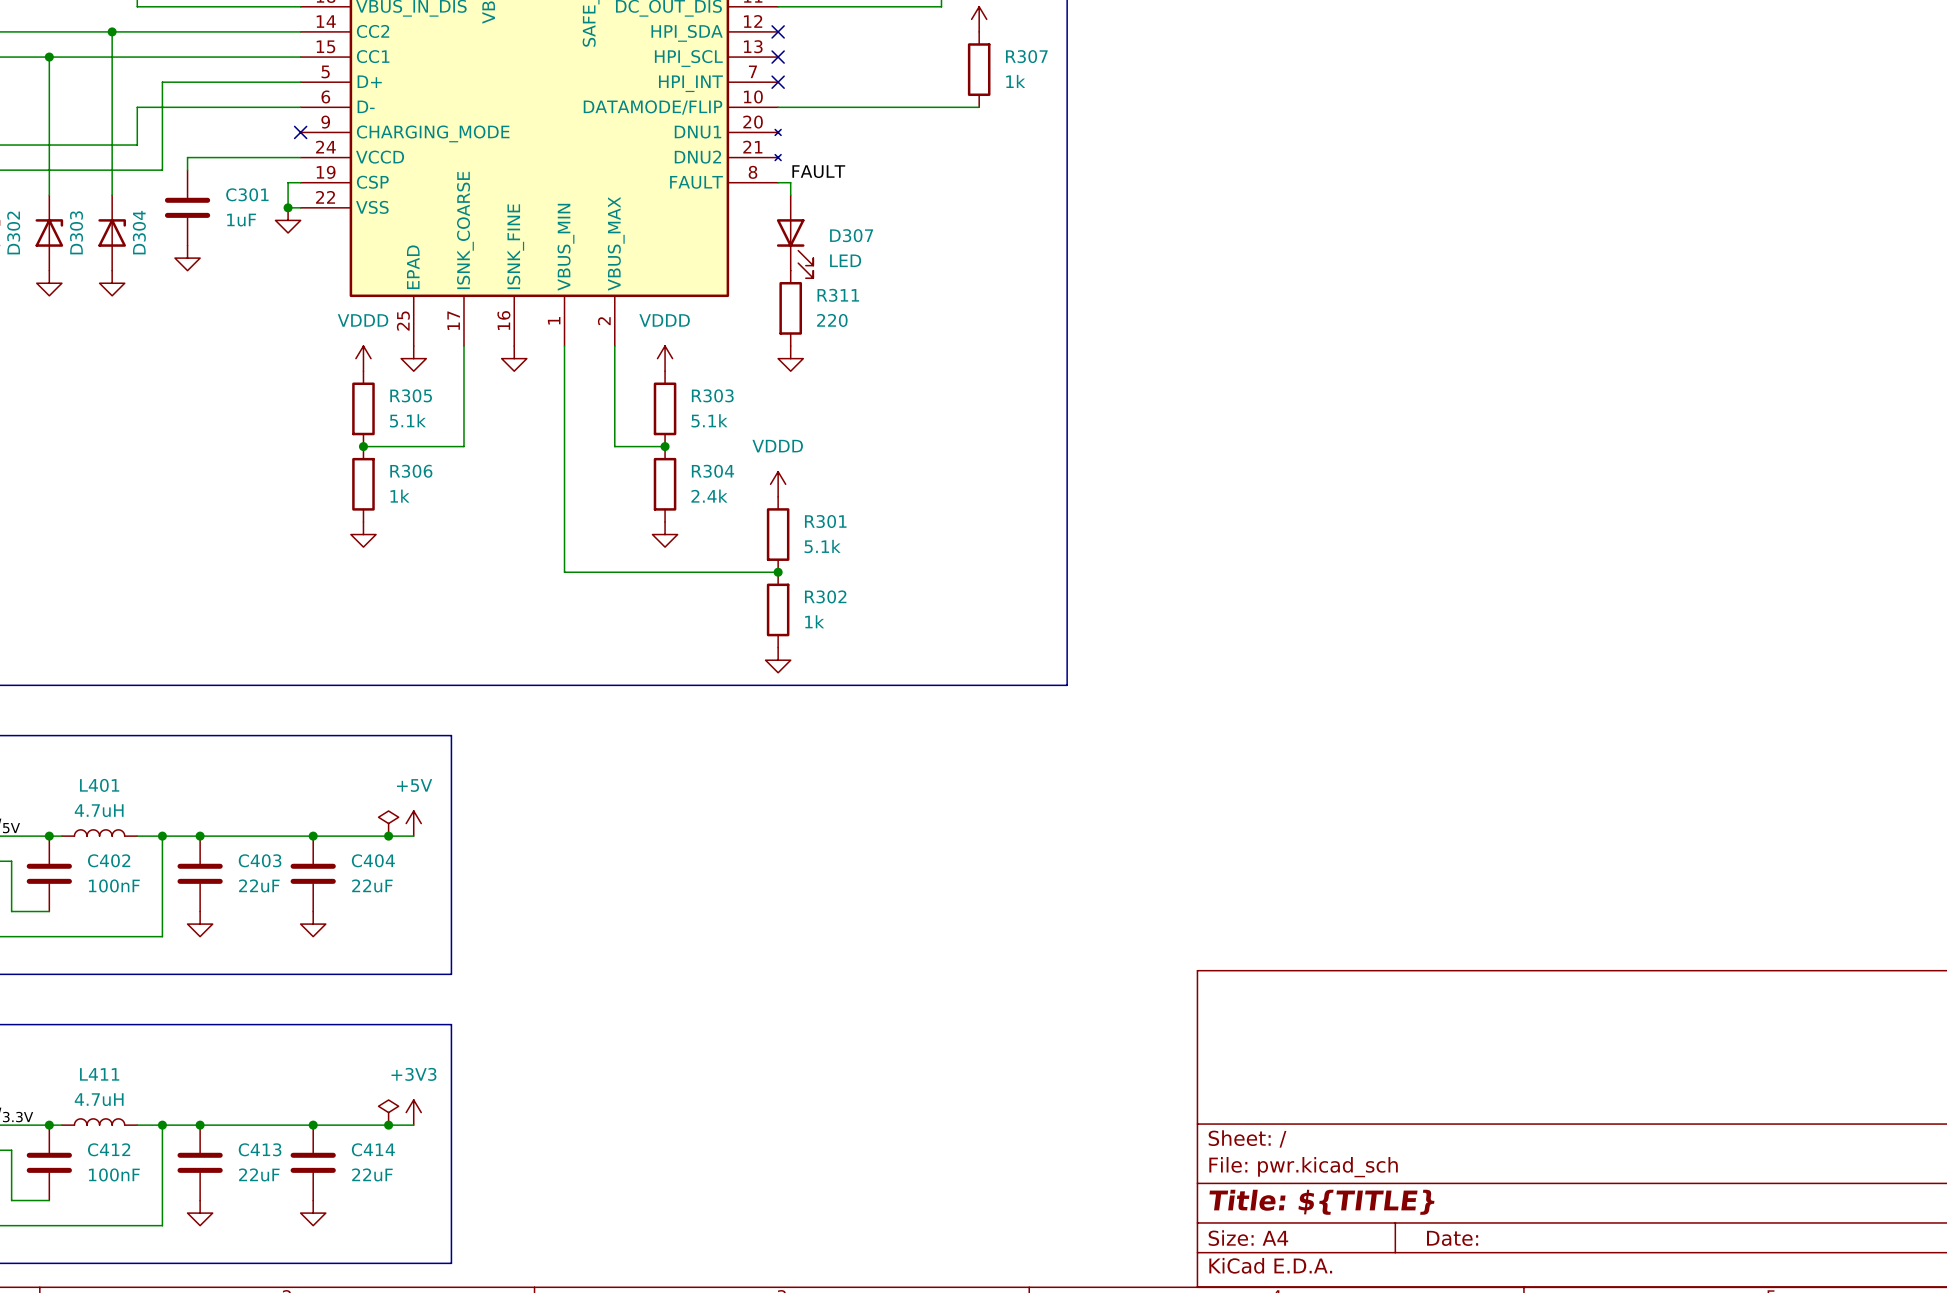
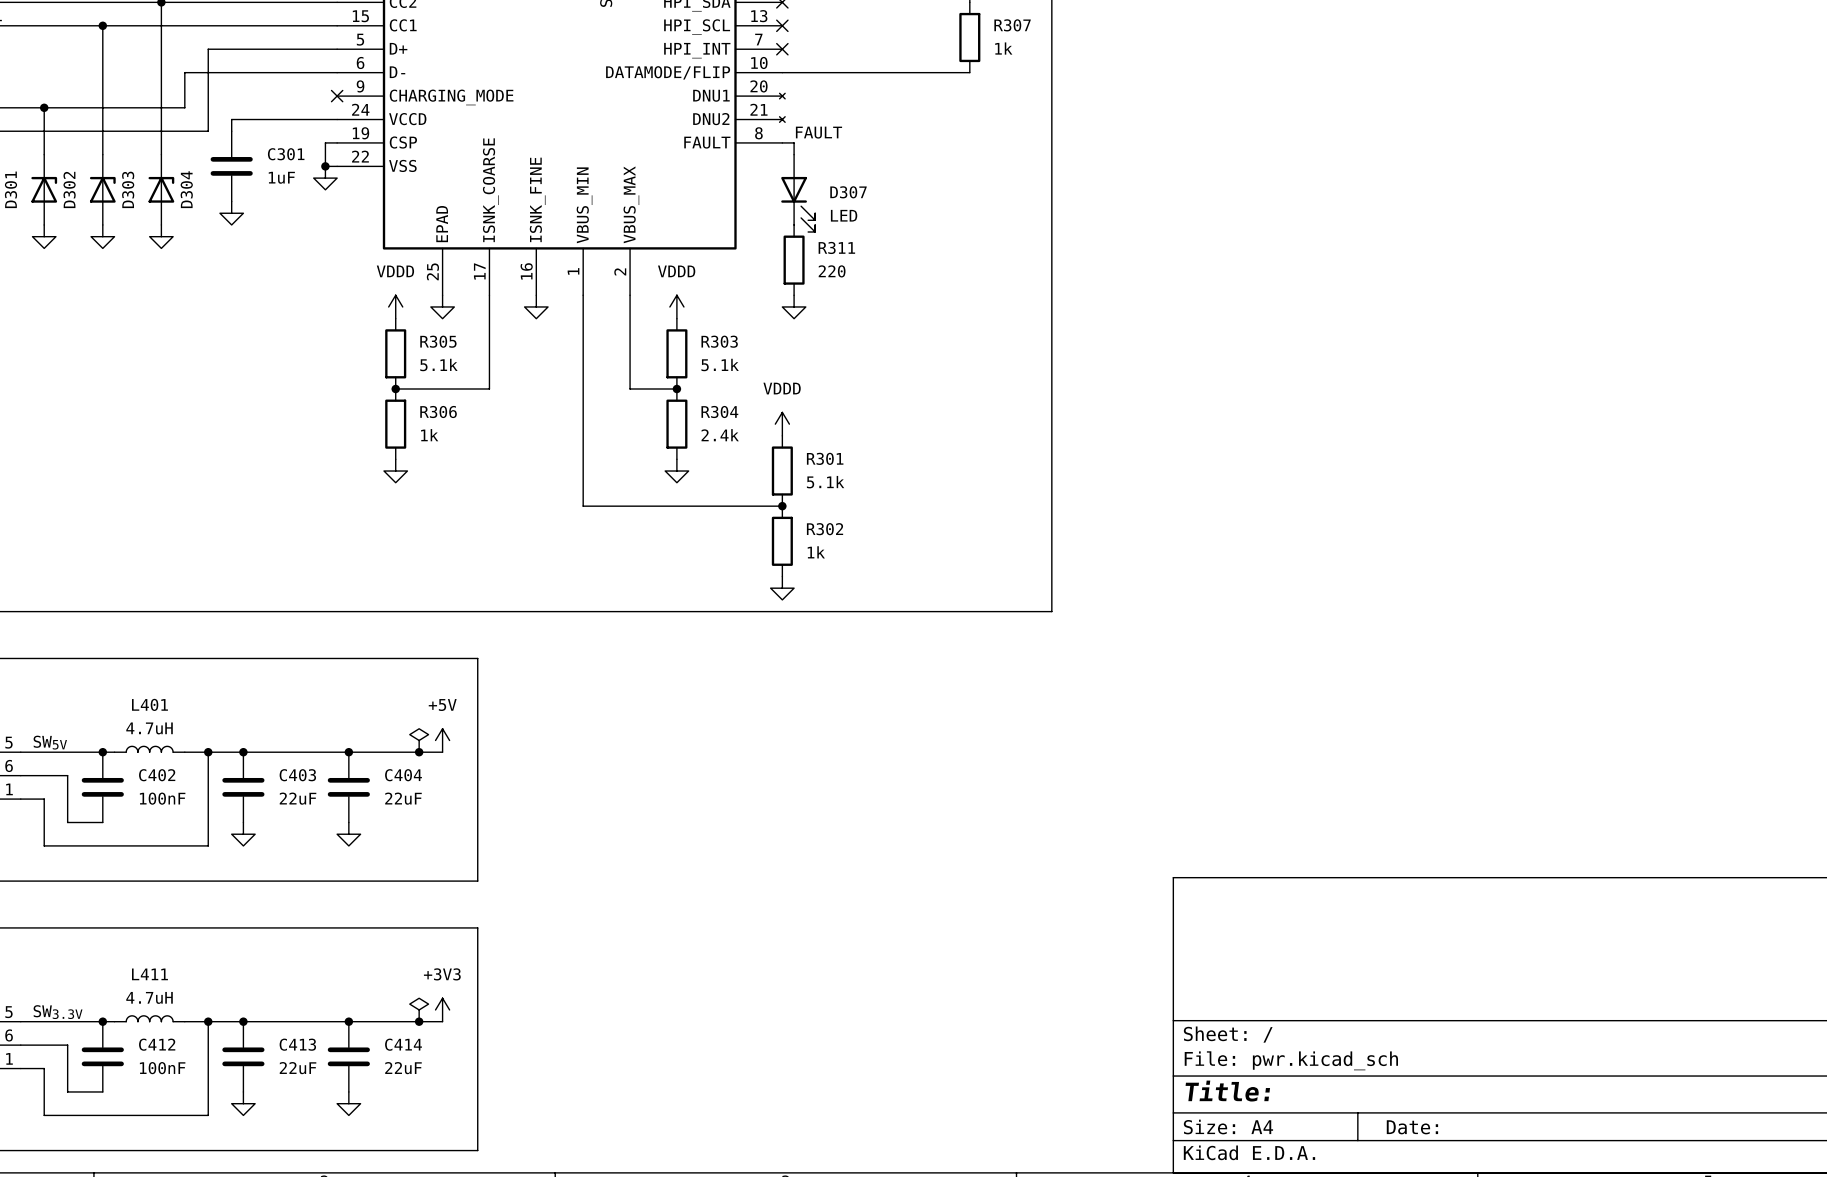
title block: Title: ${TITLE} (1321, 1202) -> Title: (1227, 1091)

